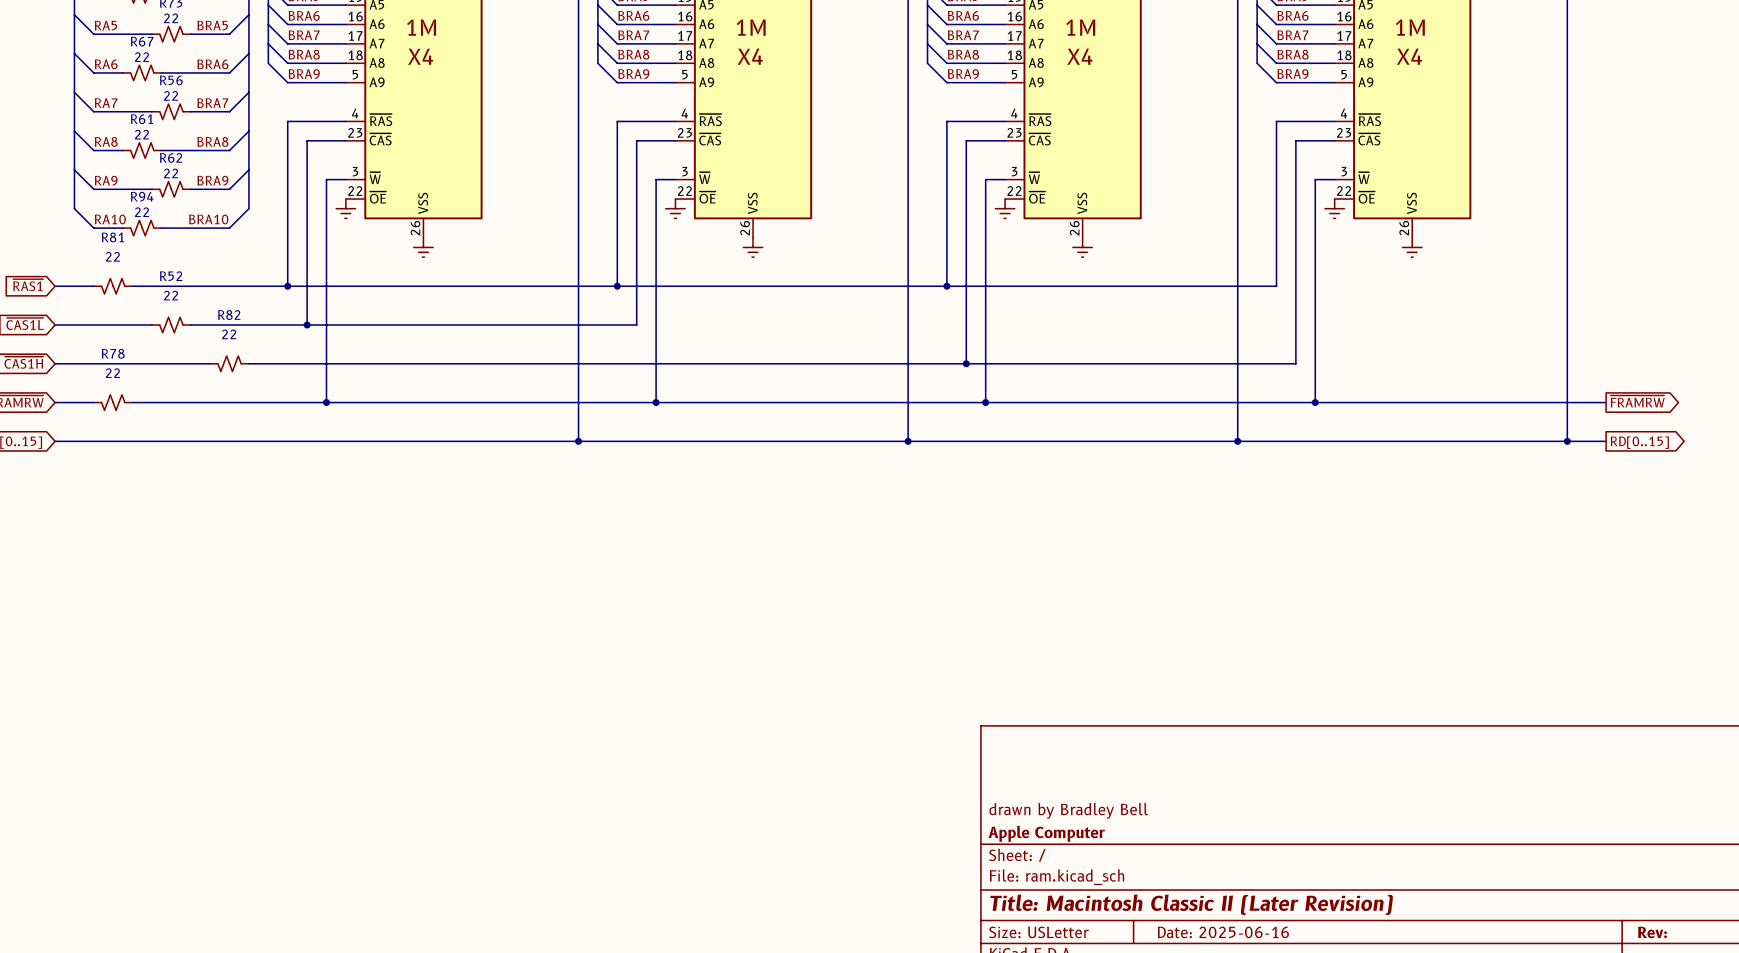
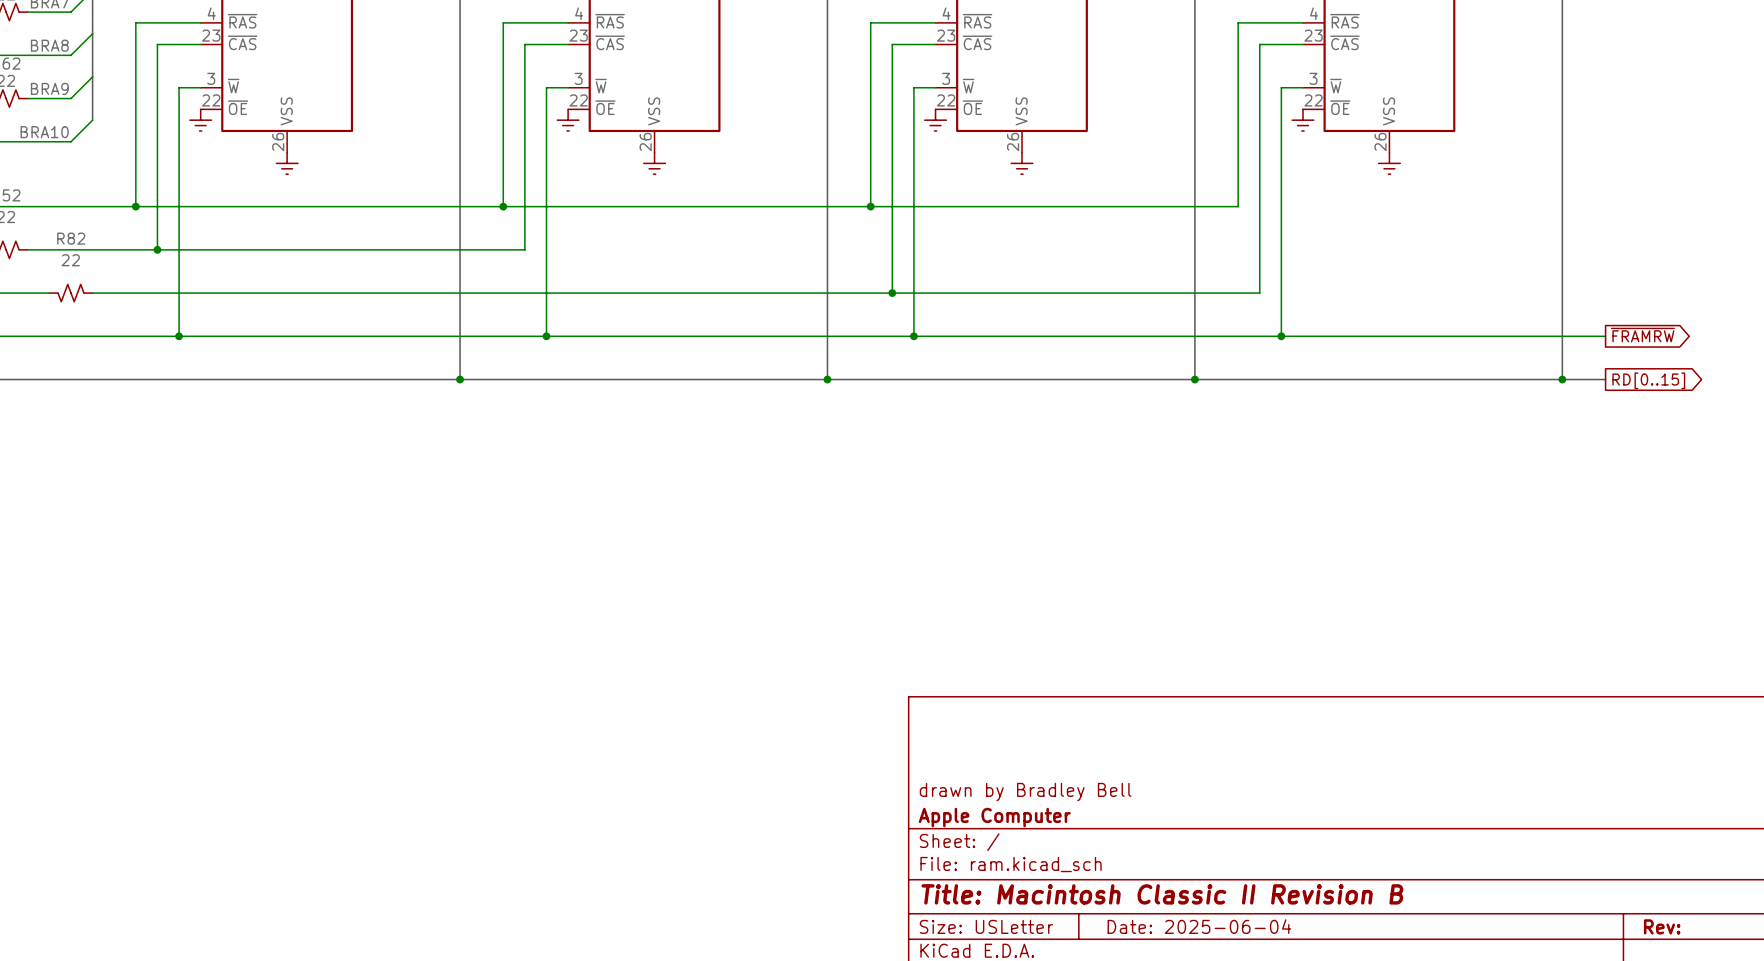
title block: Title: Macintosh Classic II (Later Revision) (1191, 904) -> Title: Macintosh Classic II Revision B (1162, 894)
title block: Date: 2025-06-16 (1223, 932) -> Date: 2025-06-04 (1199, 926)

